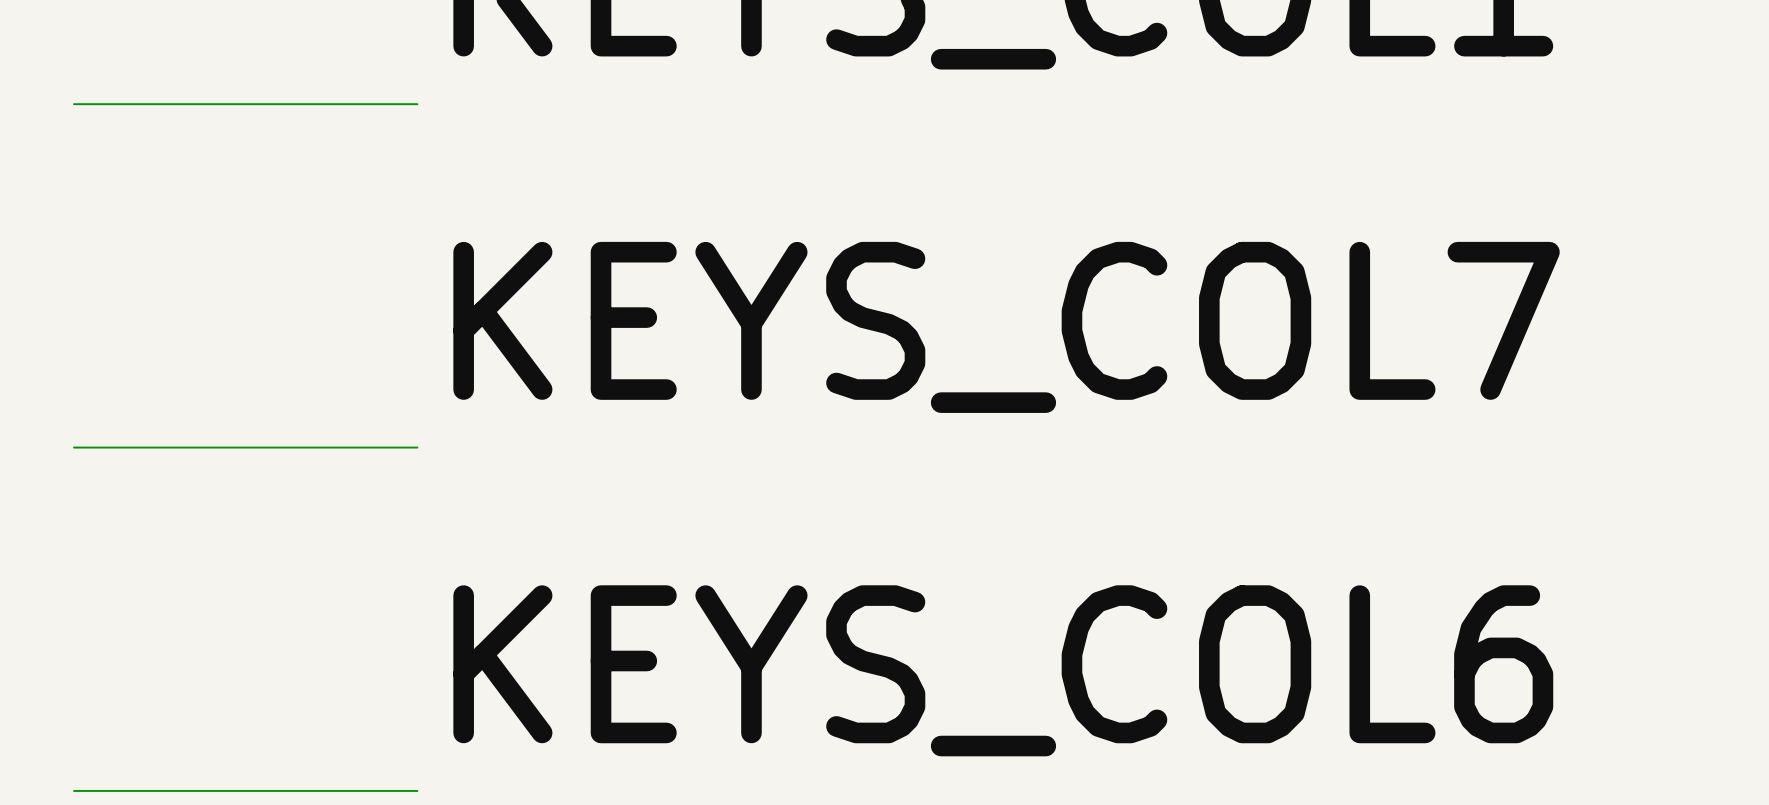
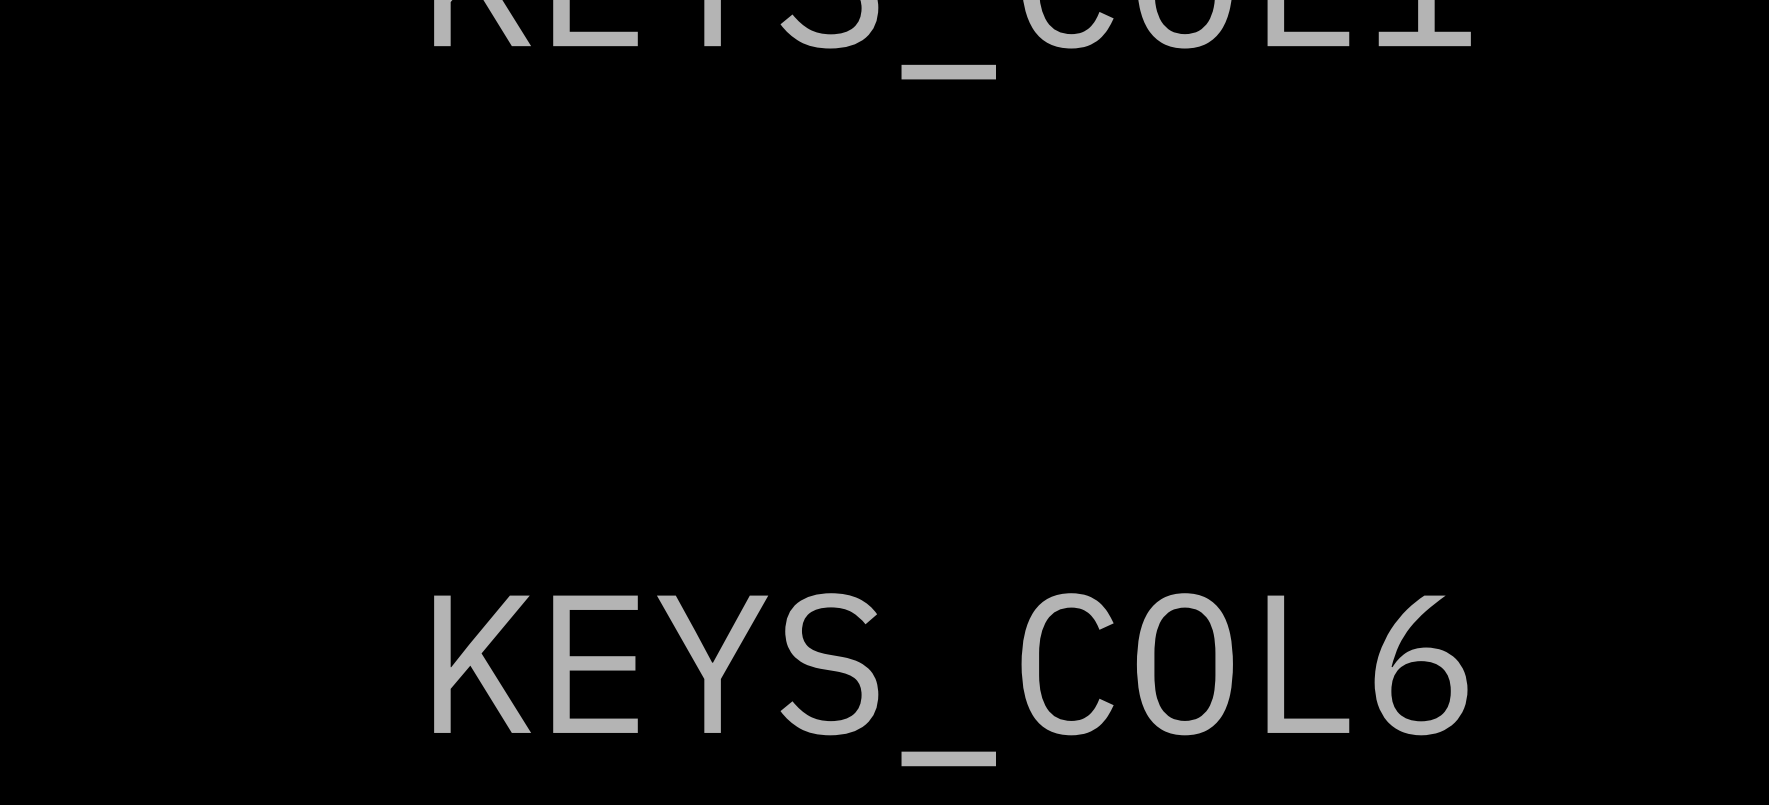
wire: (74, 104) (417, 104) -> none
label: KEYS_COL7 (1006, 327) -> none
wire: (74, 447) (417, 447) -> none
wire: (74, 790) (417, 790) -> none

